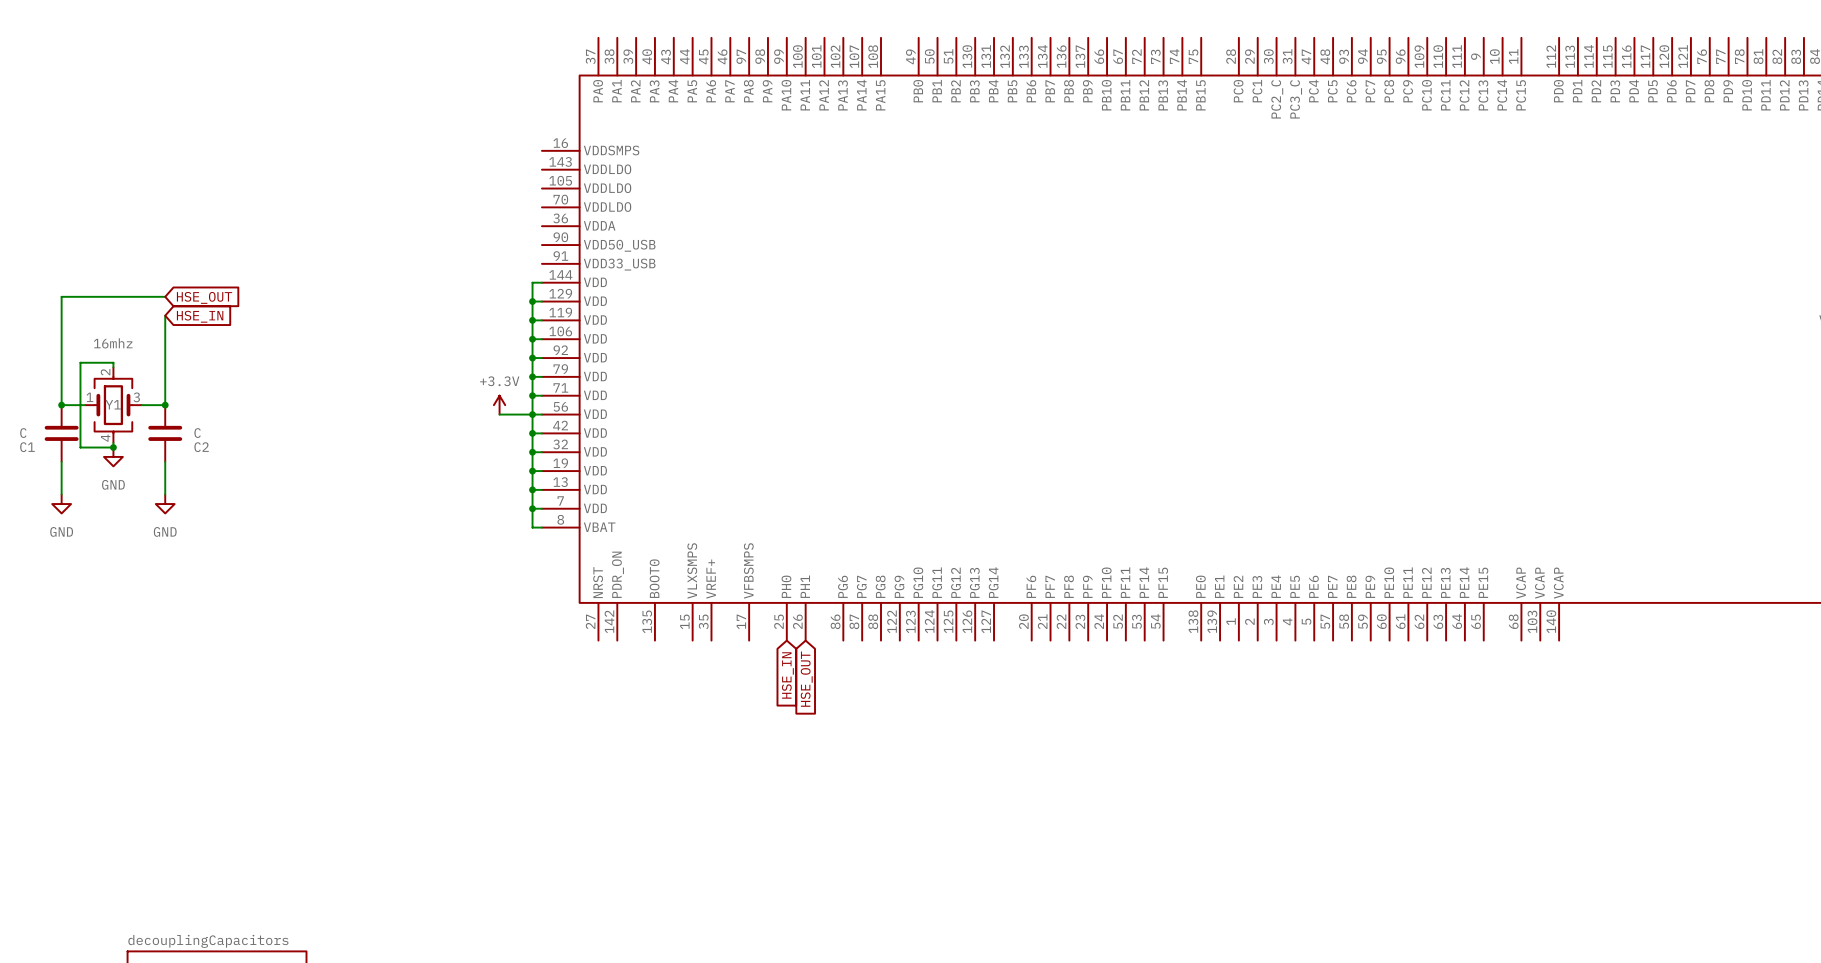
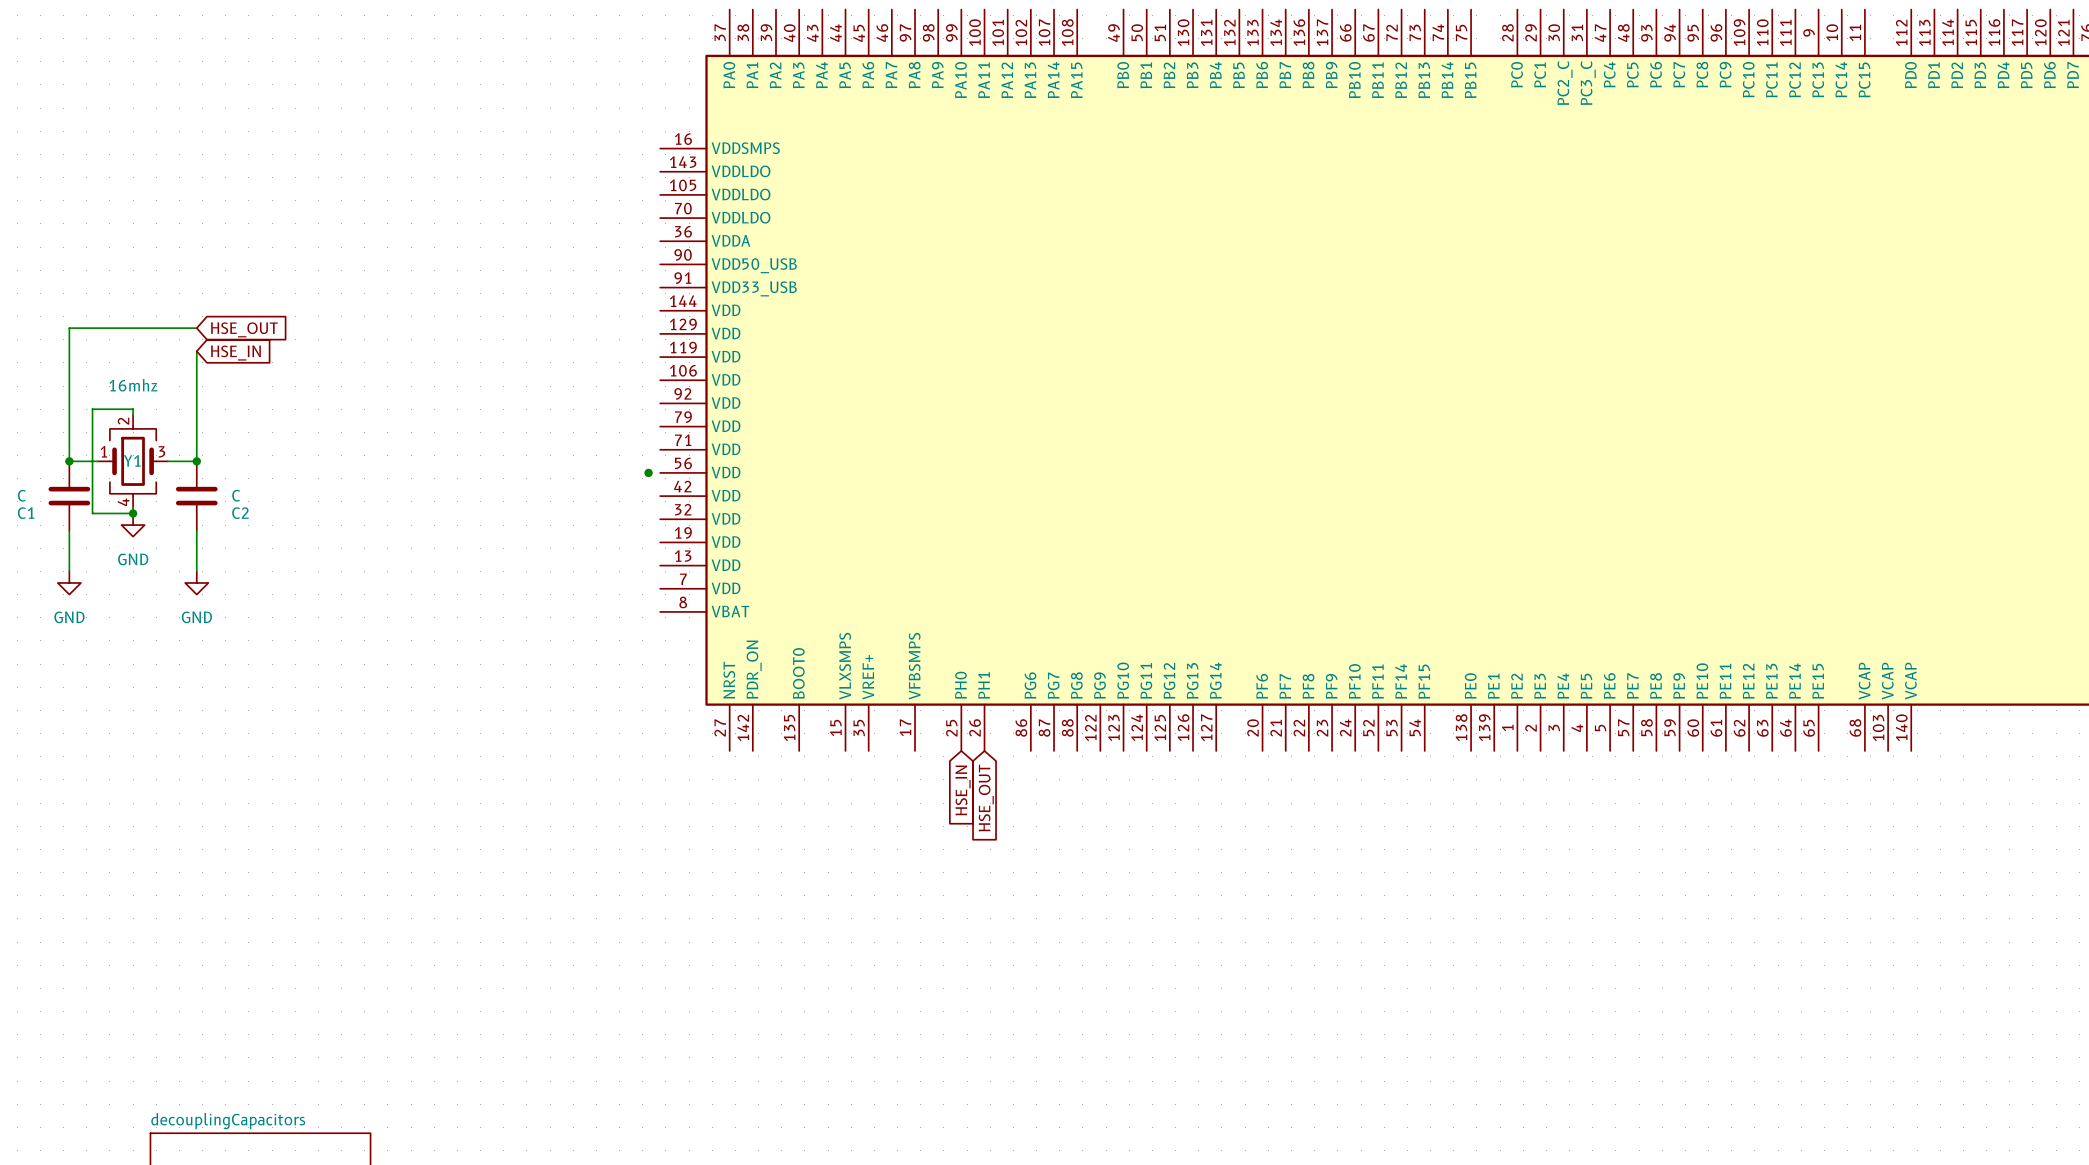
wire: (541, 282) (532, 282) (532, 508) -> none
wire: (532, 301) (541, 301) -> none
junction: (532, 301) -> none
wire: (532, 320) (541, 320) -> none
junction: (532, 320) -> none
wire: (532, 339) (541, 339) -> none
junction: (532, 339) -> none
wire: (532, 358) (541, 358) -> none
junction: (532, 358) -> none
wire: (532, 376) (541, 376) -> none
junction: (532, 376) -> none
wire: (532, 395) (541, 395) -> none
junction: (532, 395) -> none
power symbol: +3.3V (499, 405) -> none
wire: (499, 414) (541, 414) -> none
wire: (532, 433) (541, 433) -> none
junction: (532, 433) -> none
wire: (532, 452) (541, 452) -> none
junction: (532, 452) -> none
wire: (532, 471) (541, 471) -> none
junction: (532, 471) -> none
wire: (532, 489) (541, 489) -> none
junction: (532, 489) -> none
wire: (532, 508) (541, 508) -> none
wire: (532, 508) (532, 527) (541, 527) -> none
junction: (532, 508) -> none

